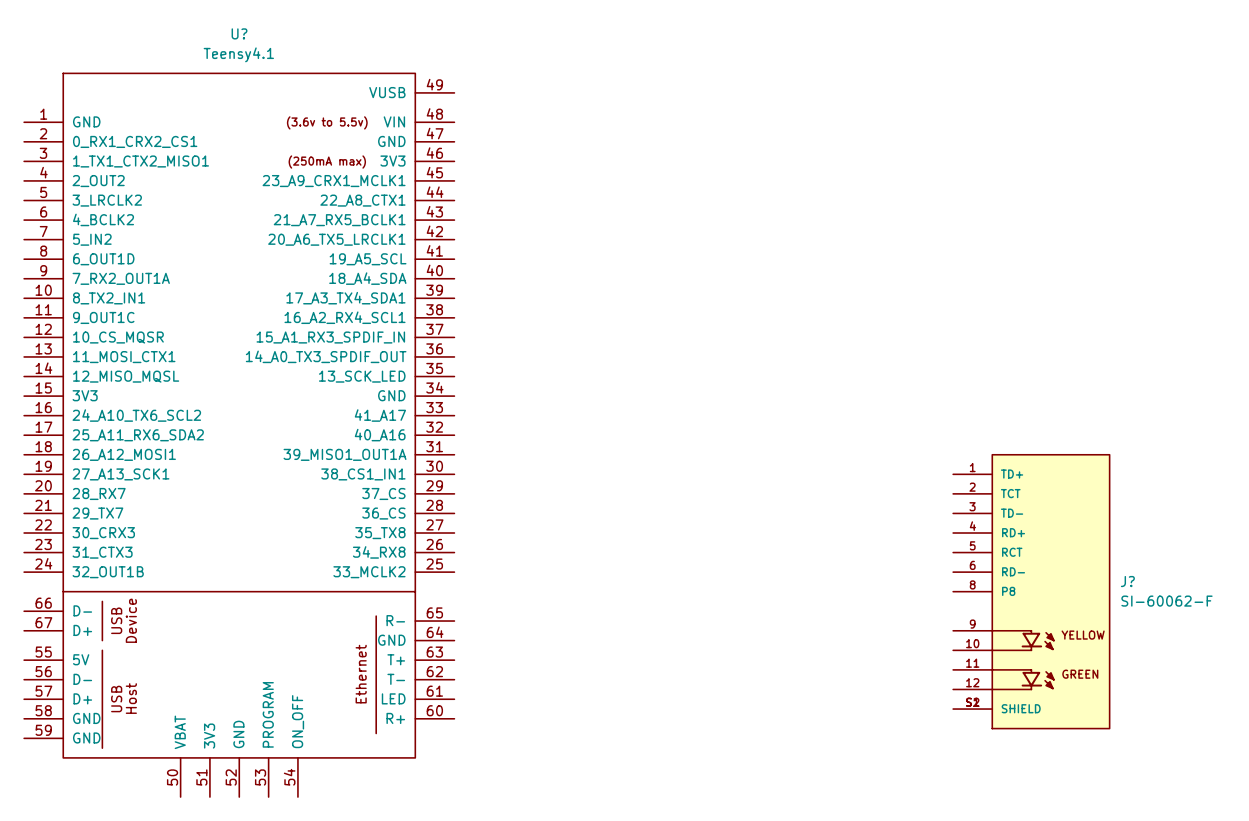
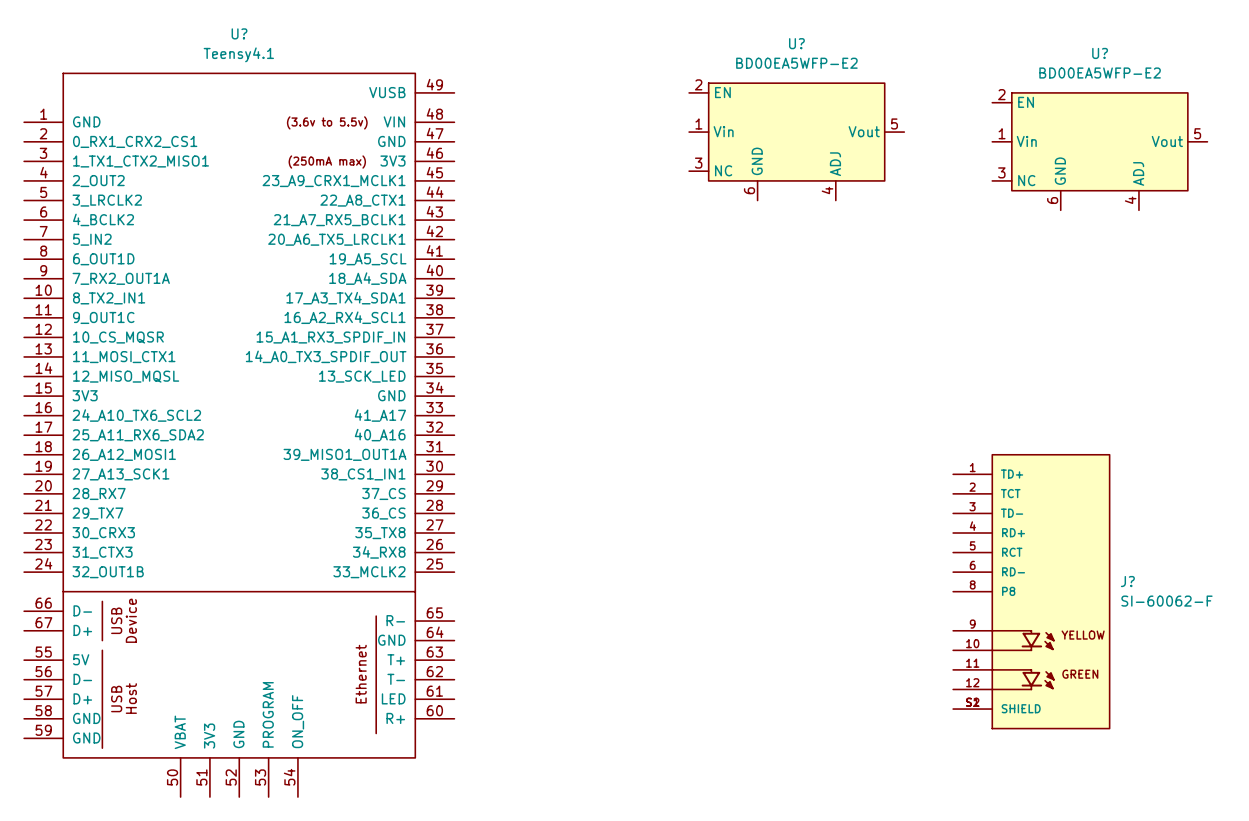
U?: none -> BD00EA5WFP-E2 (796, 141)
U?: none -> BD00EA5WFP-E2 (1099, 151)

